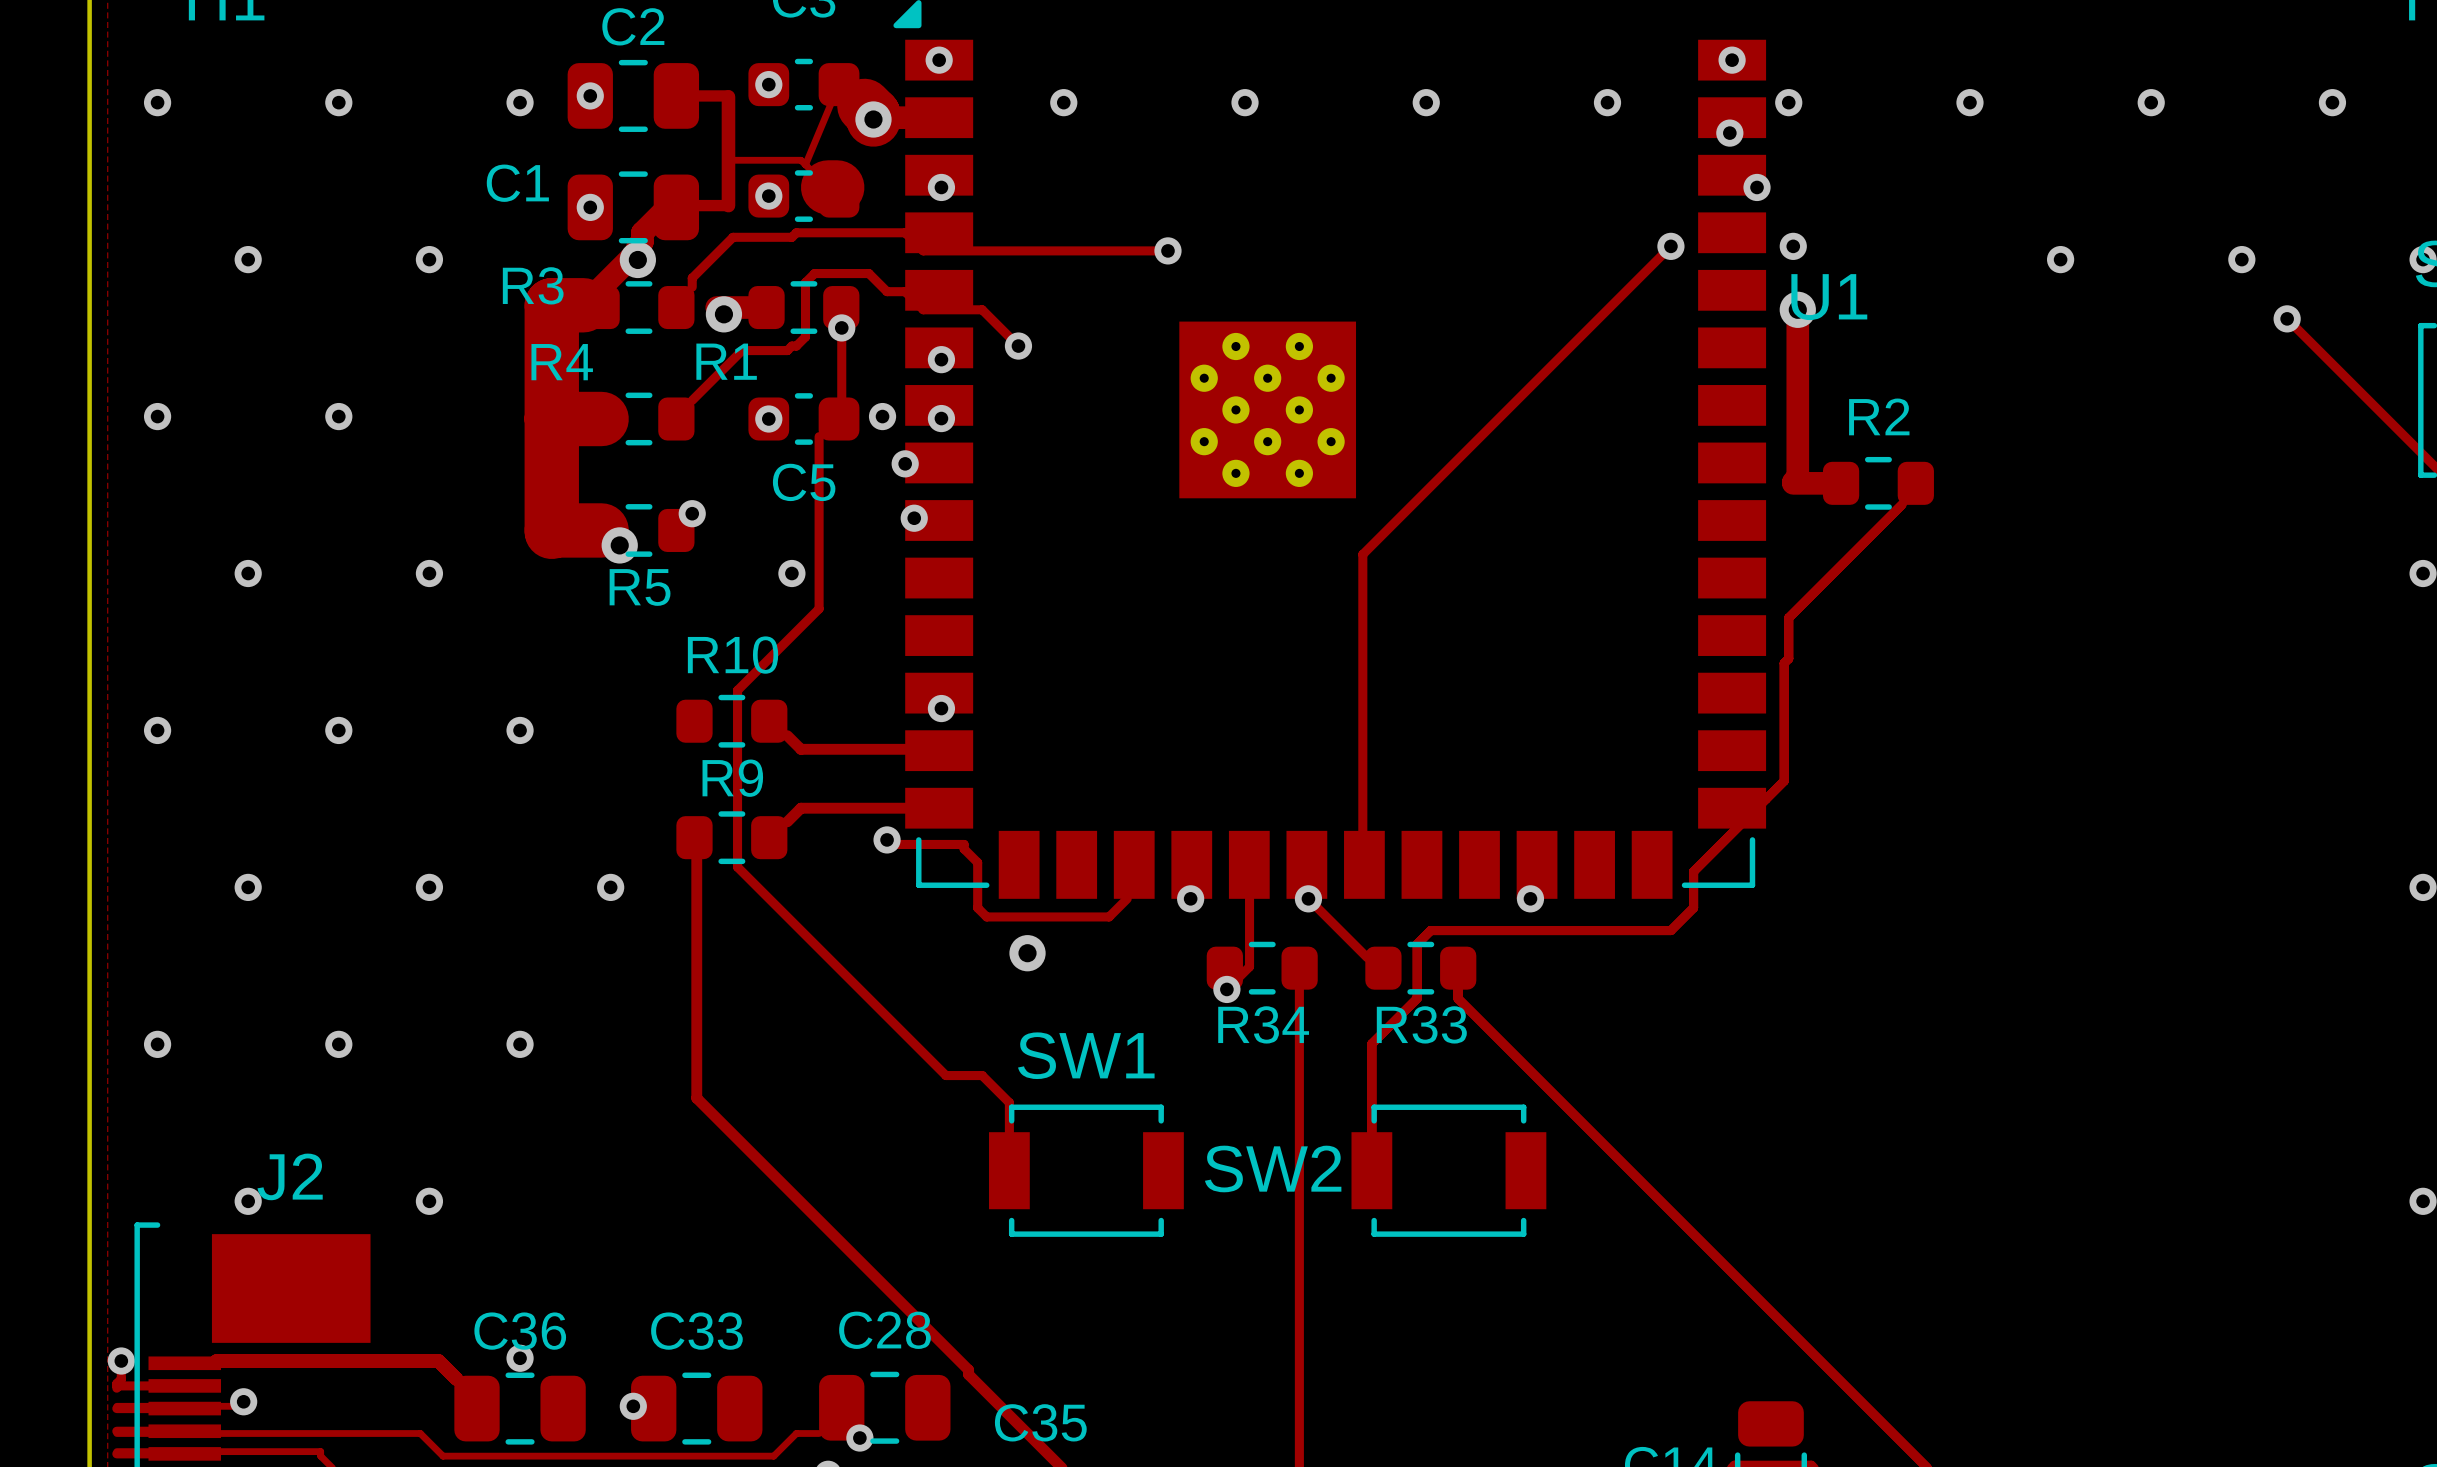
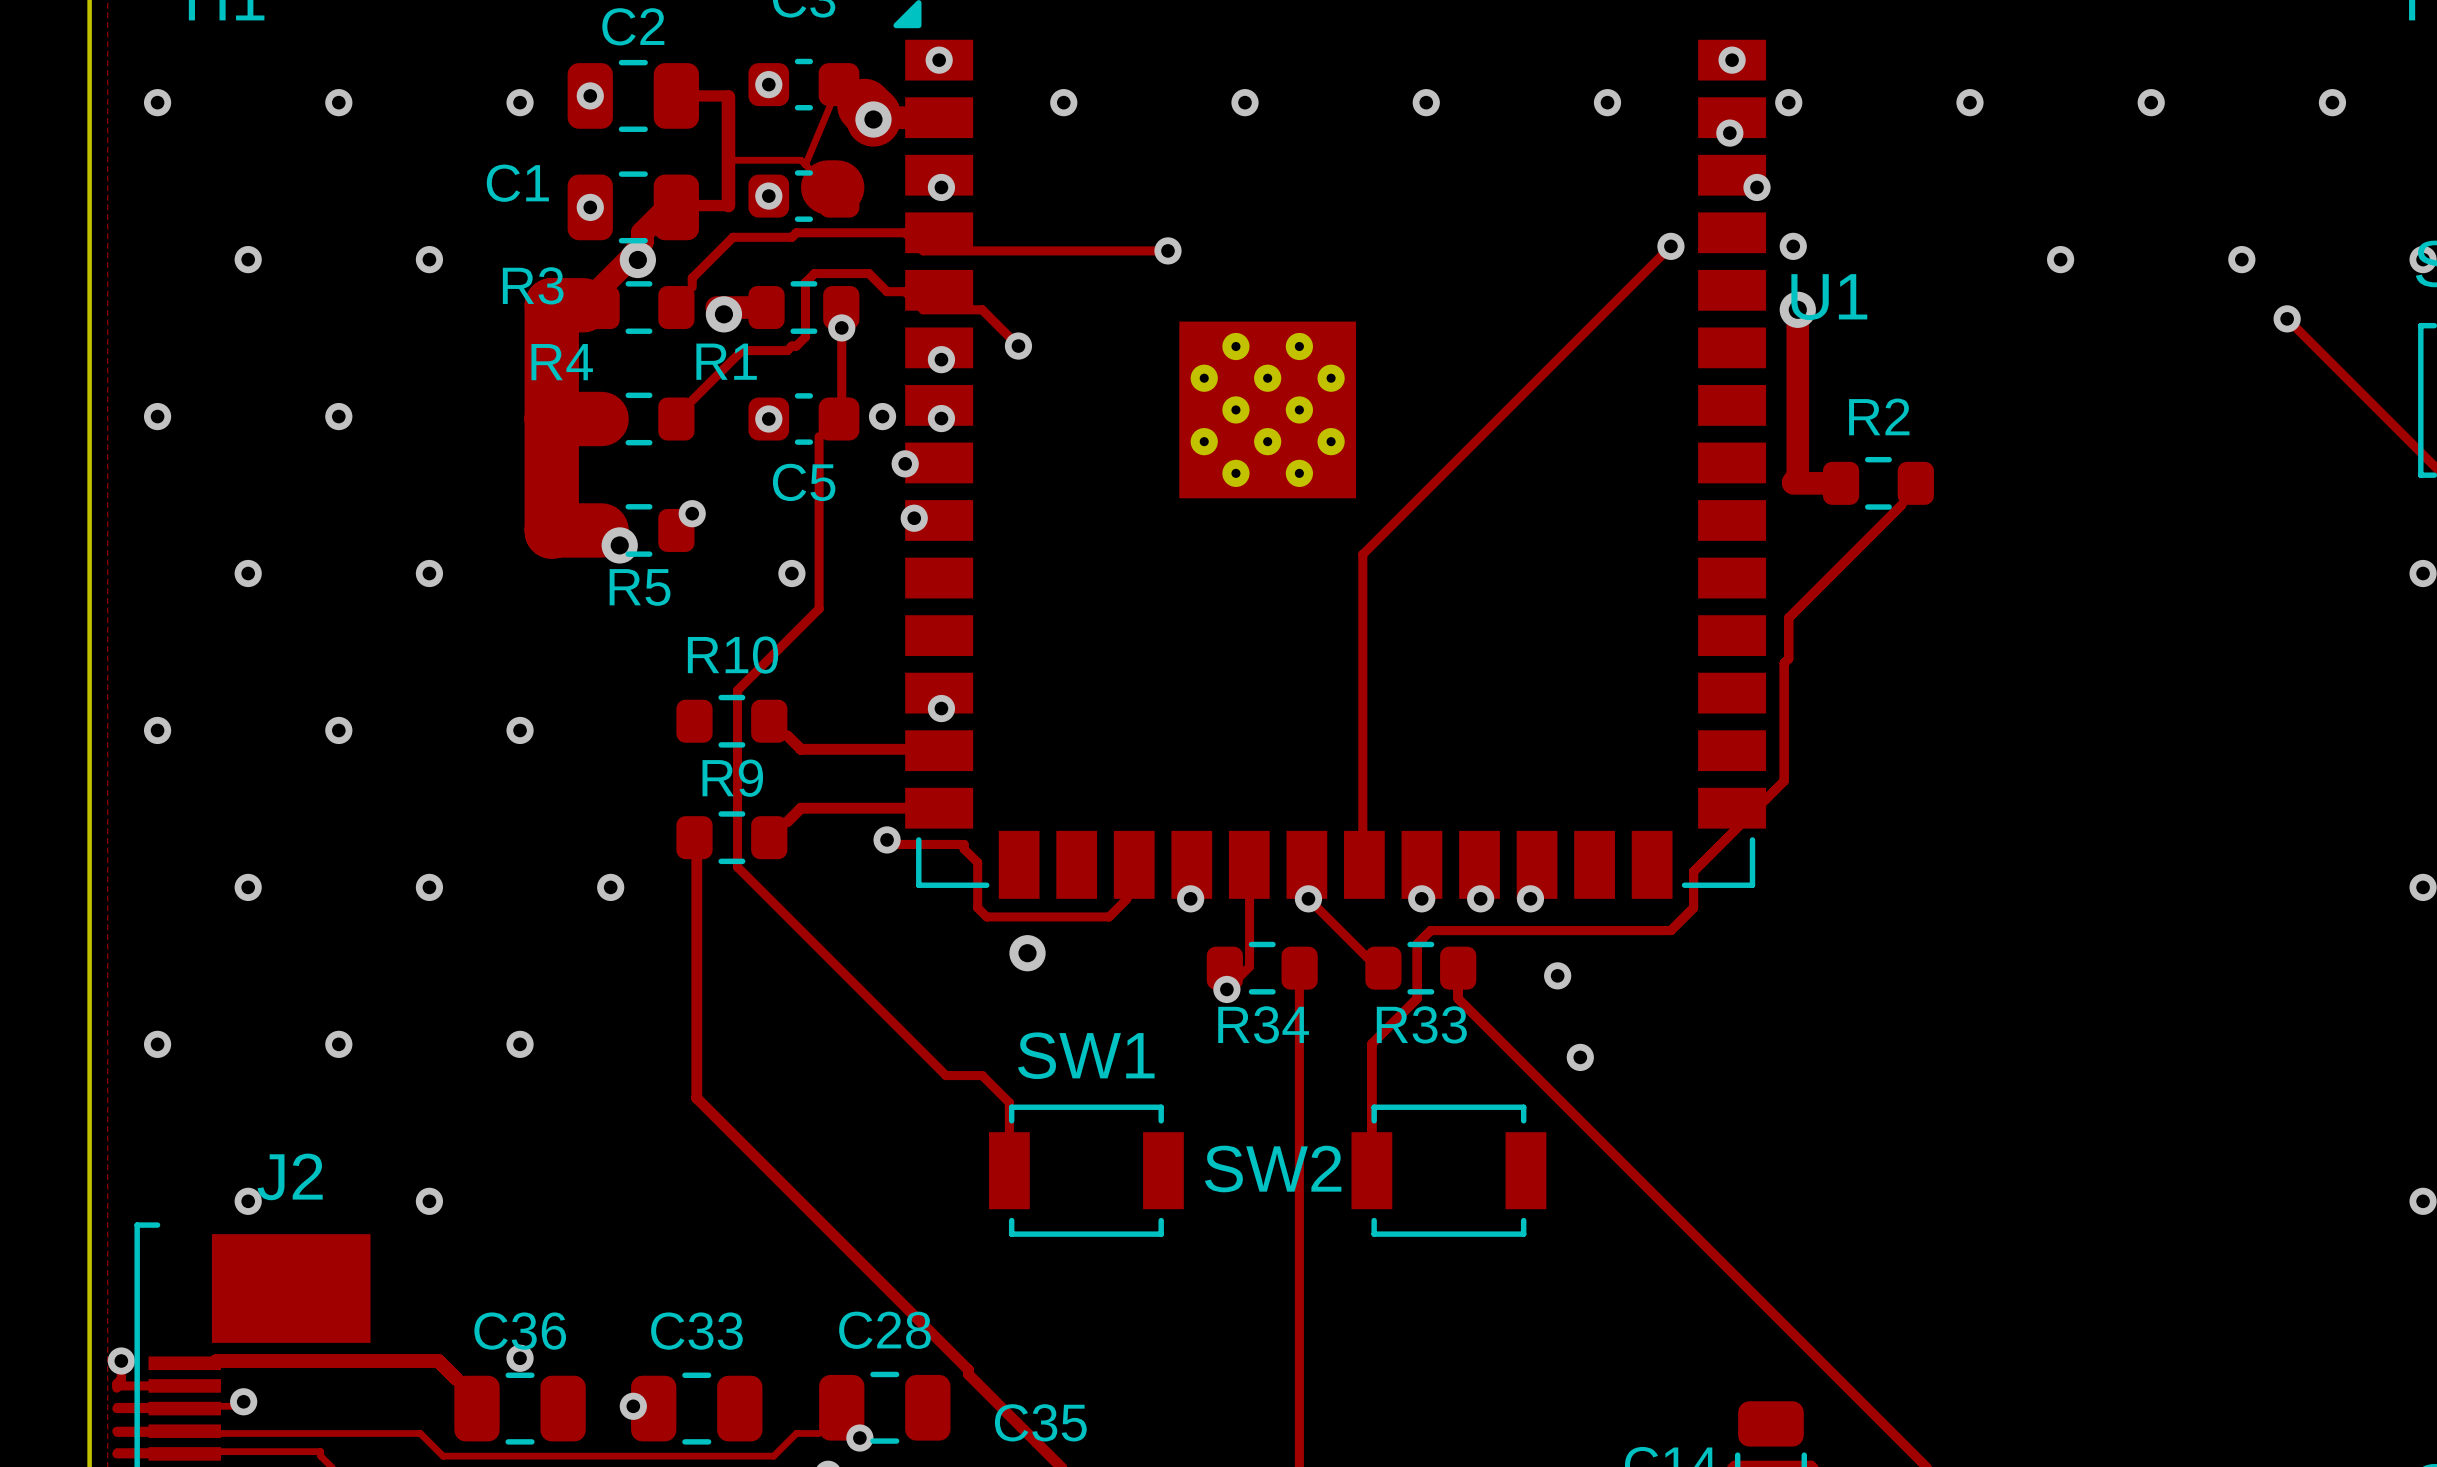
via: none -> (1421, 898)
via: none -> (1480, 898)
via: none -> (1557, 975)
via: none -> (1580, 1057)

